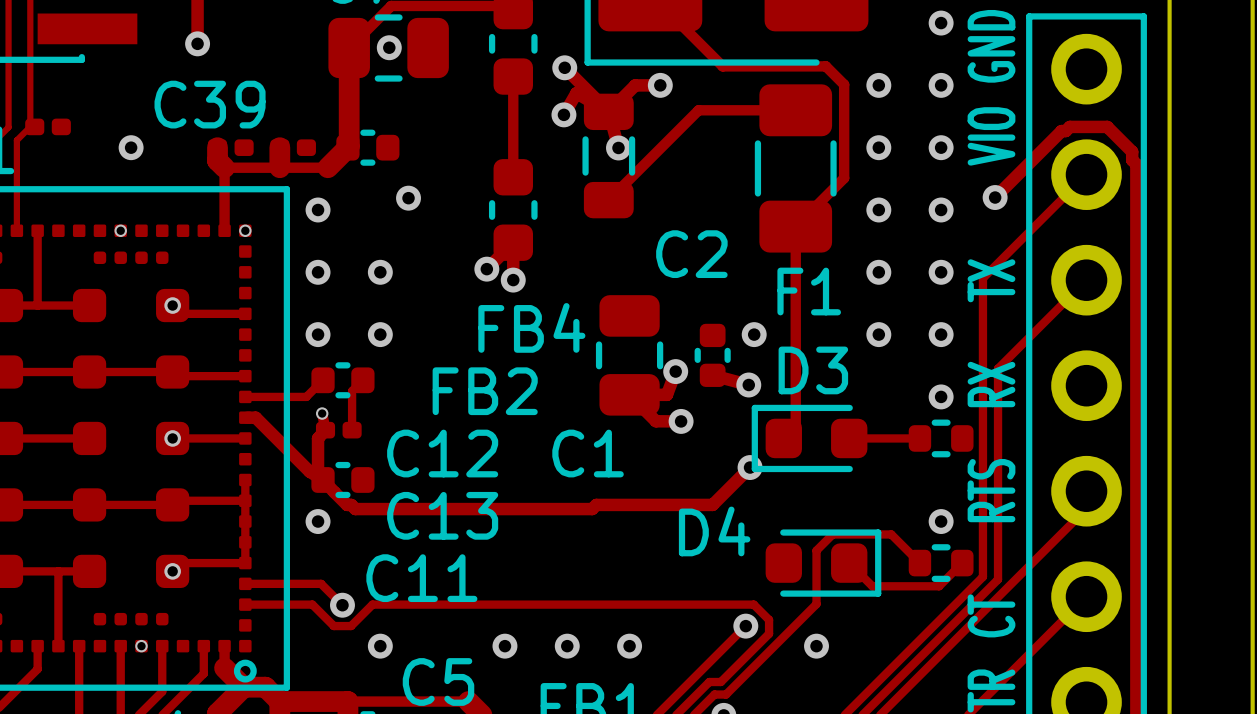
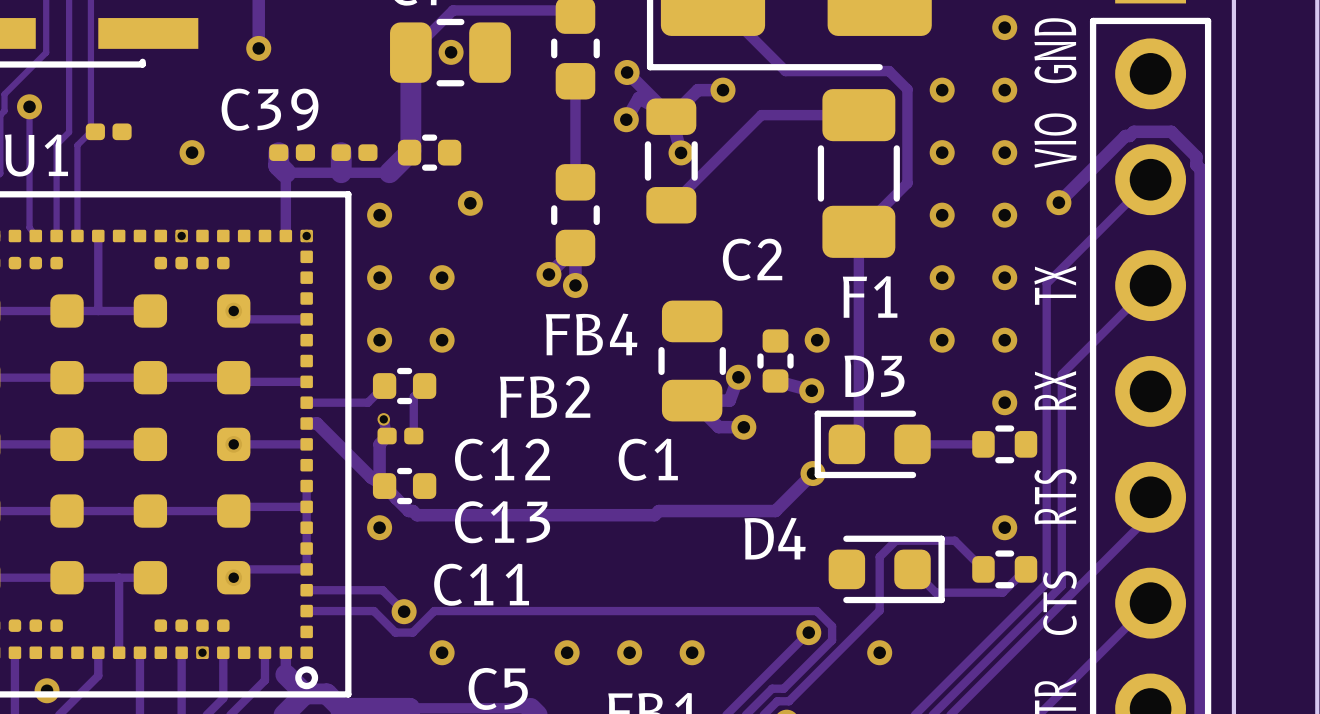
text: CT (991, 615) -> CTS (1059, 603)

